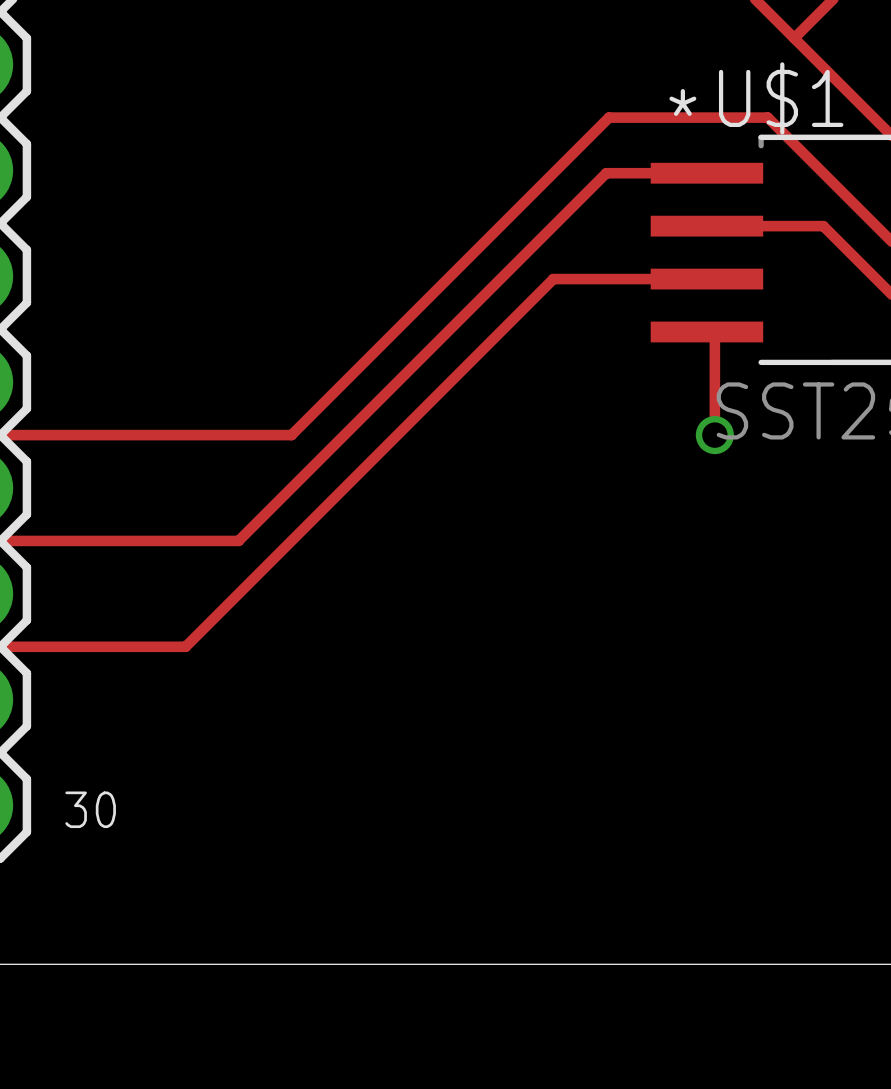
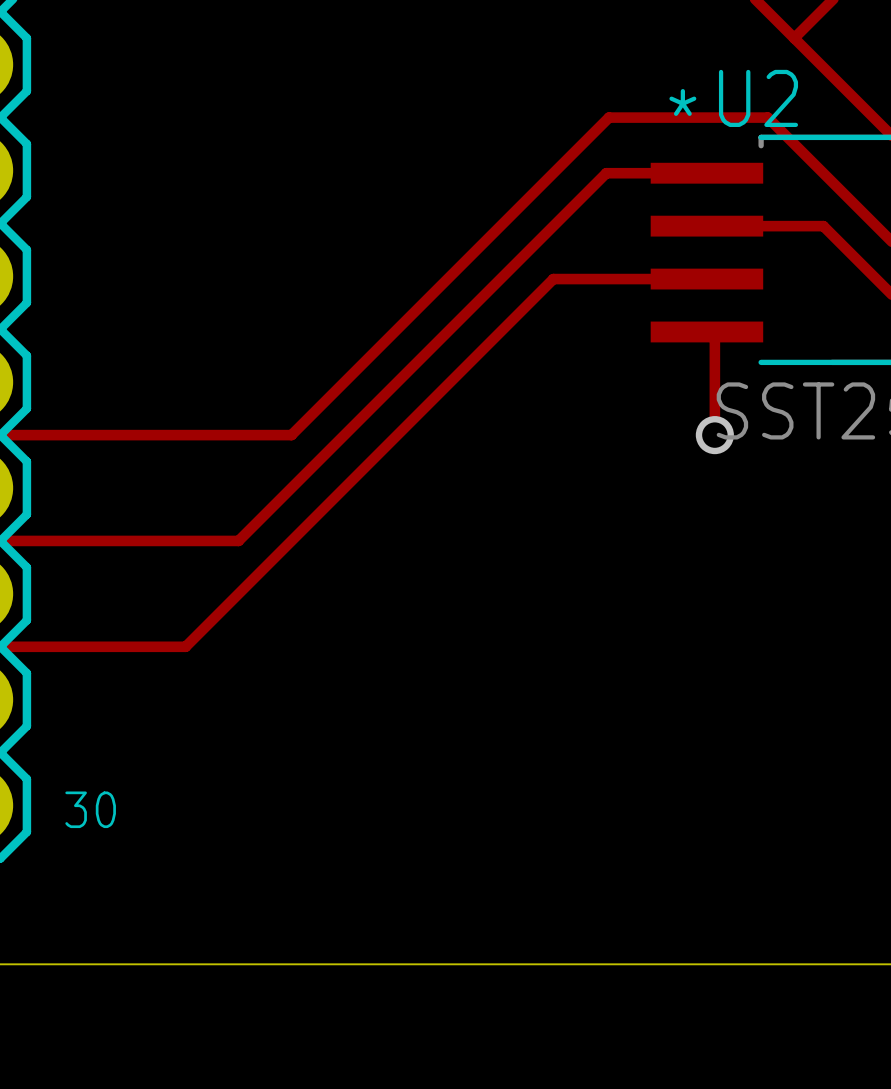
U$1 name: U$1 (781, 98) -> U2 (758, 98)

